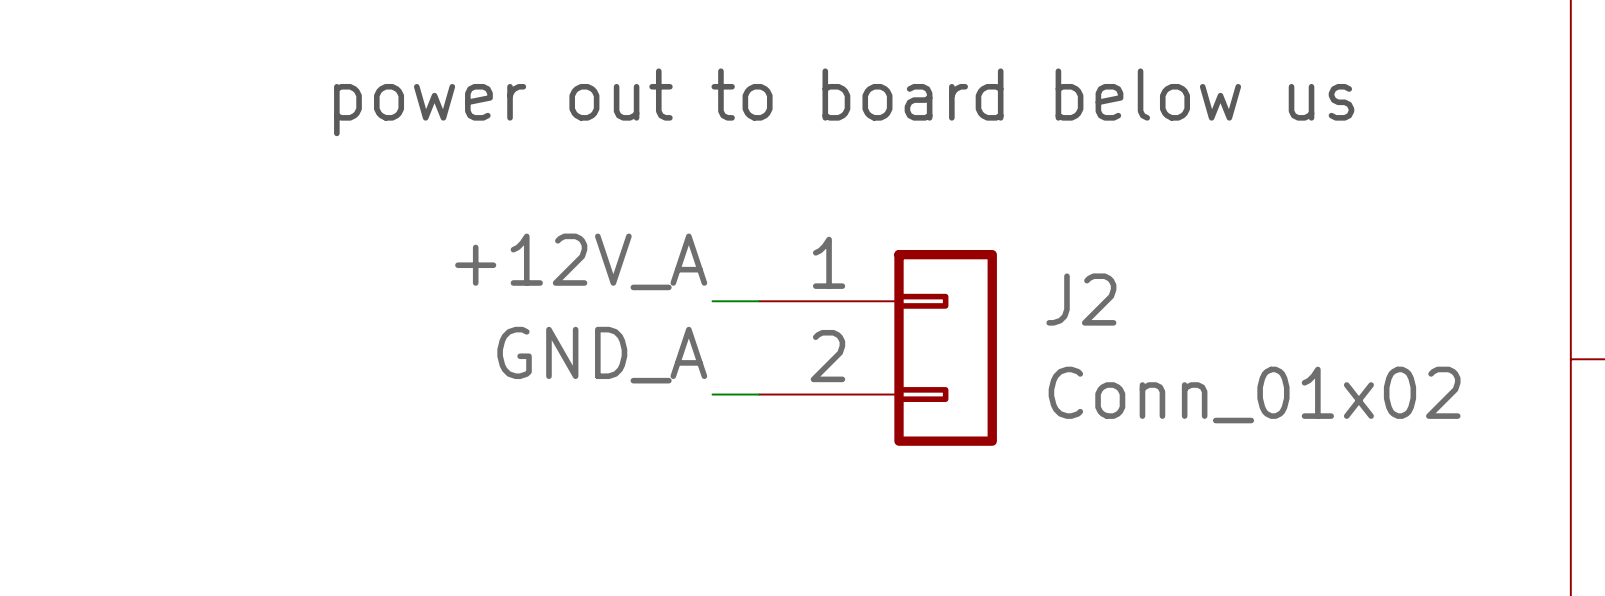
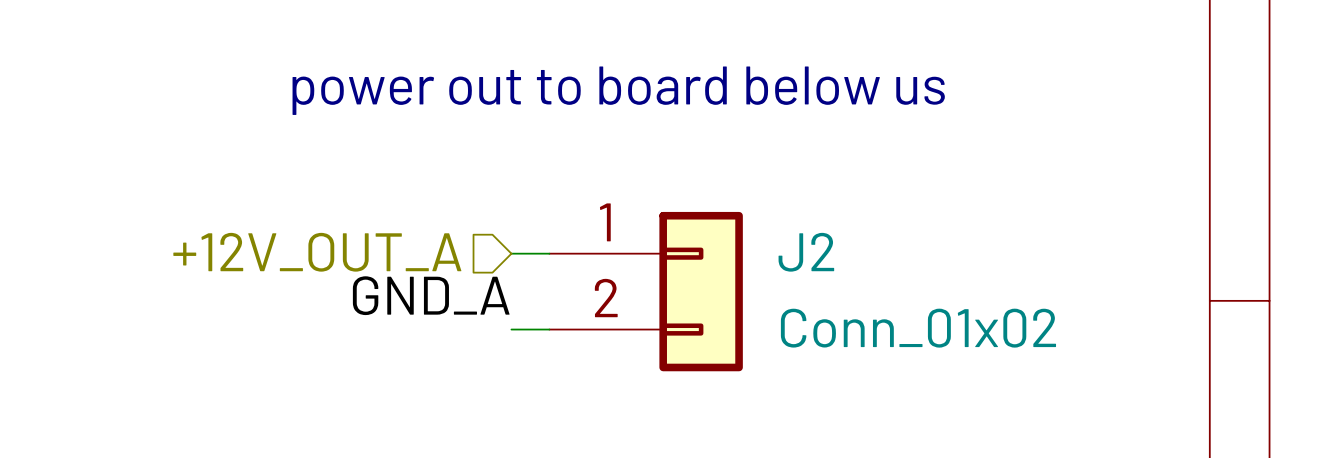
label: +12V_A (581, 261) -> none
hierarchical label: none -> +12V_OUT_A (317, 252)

